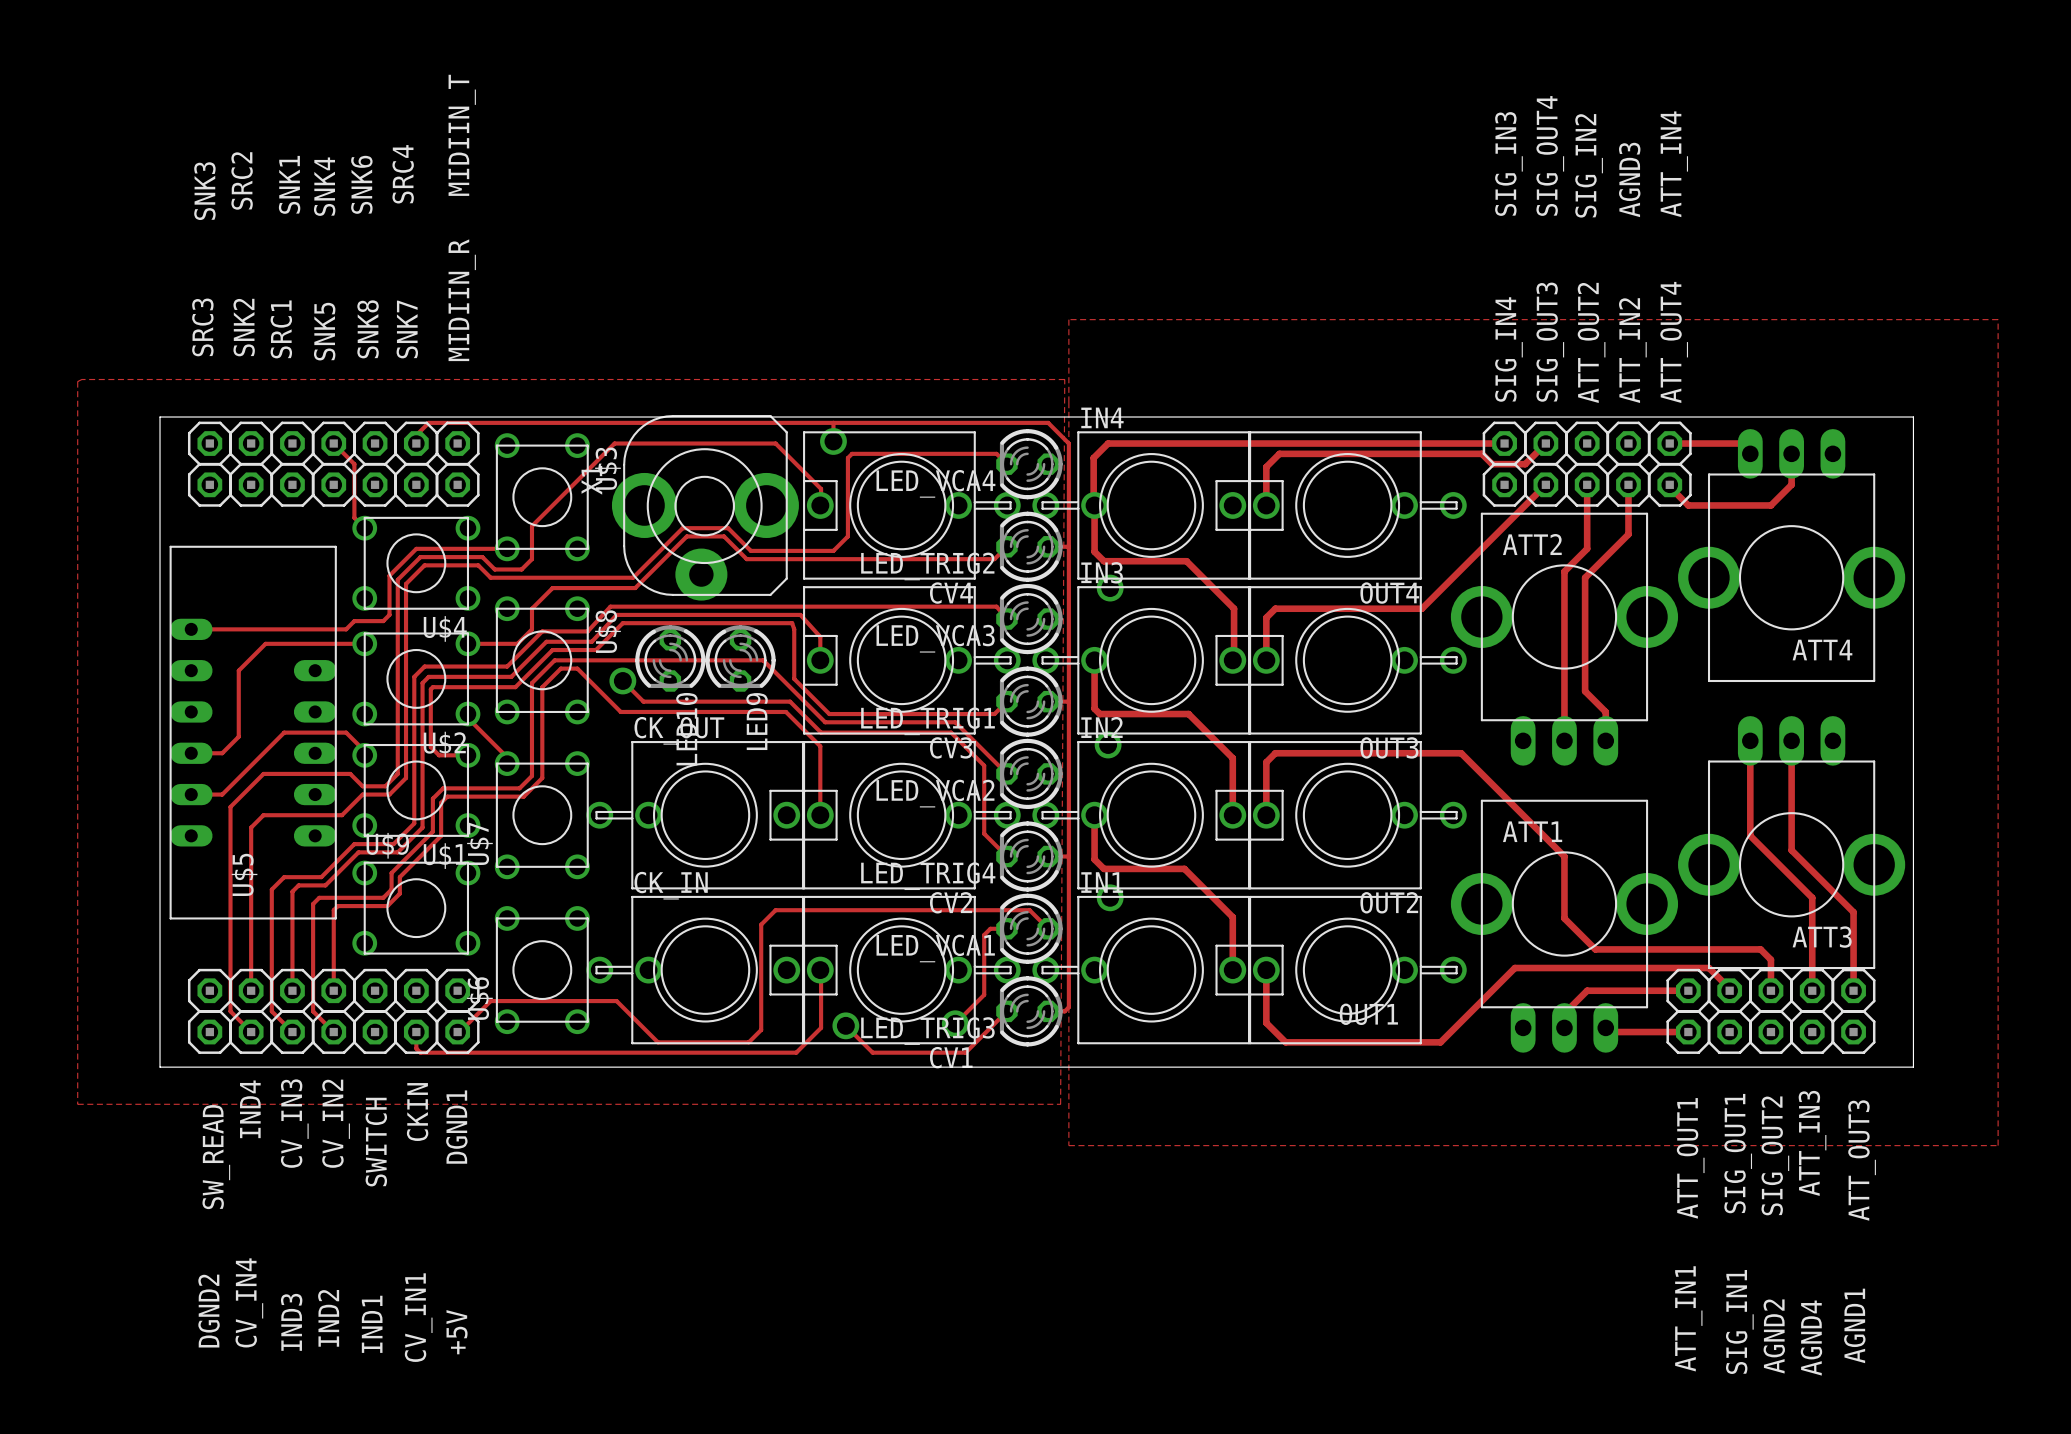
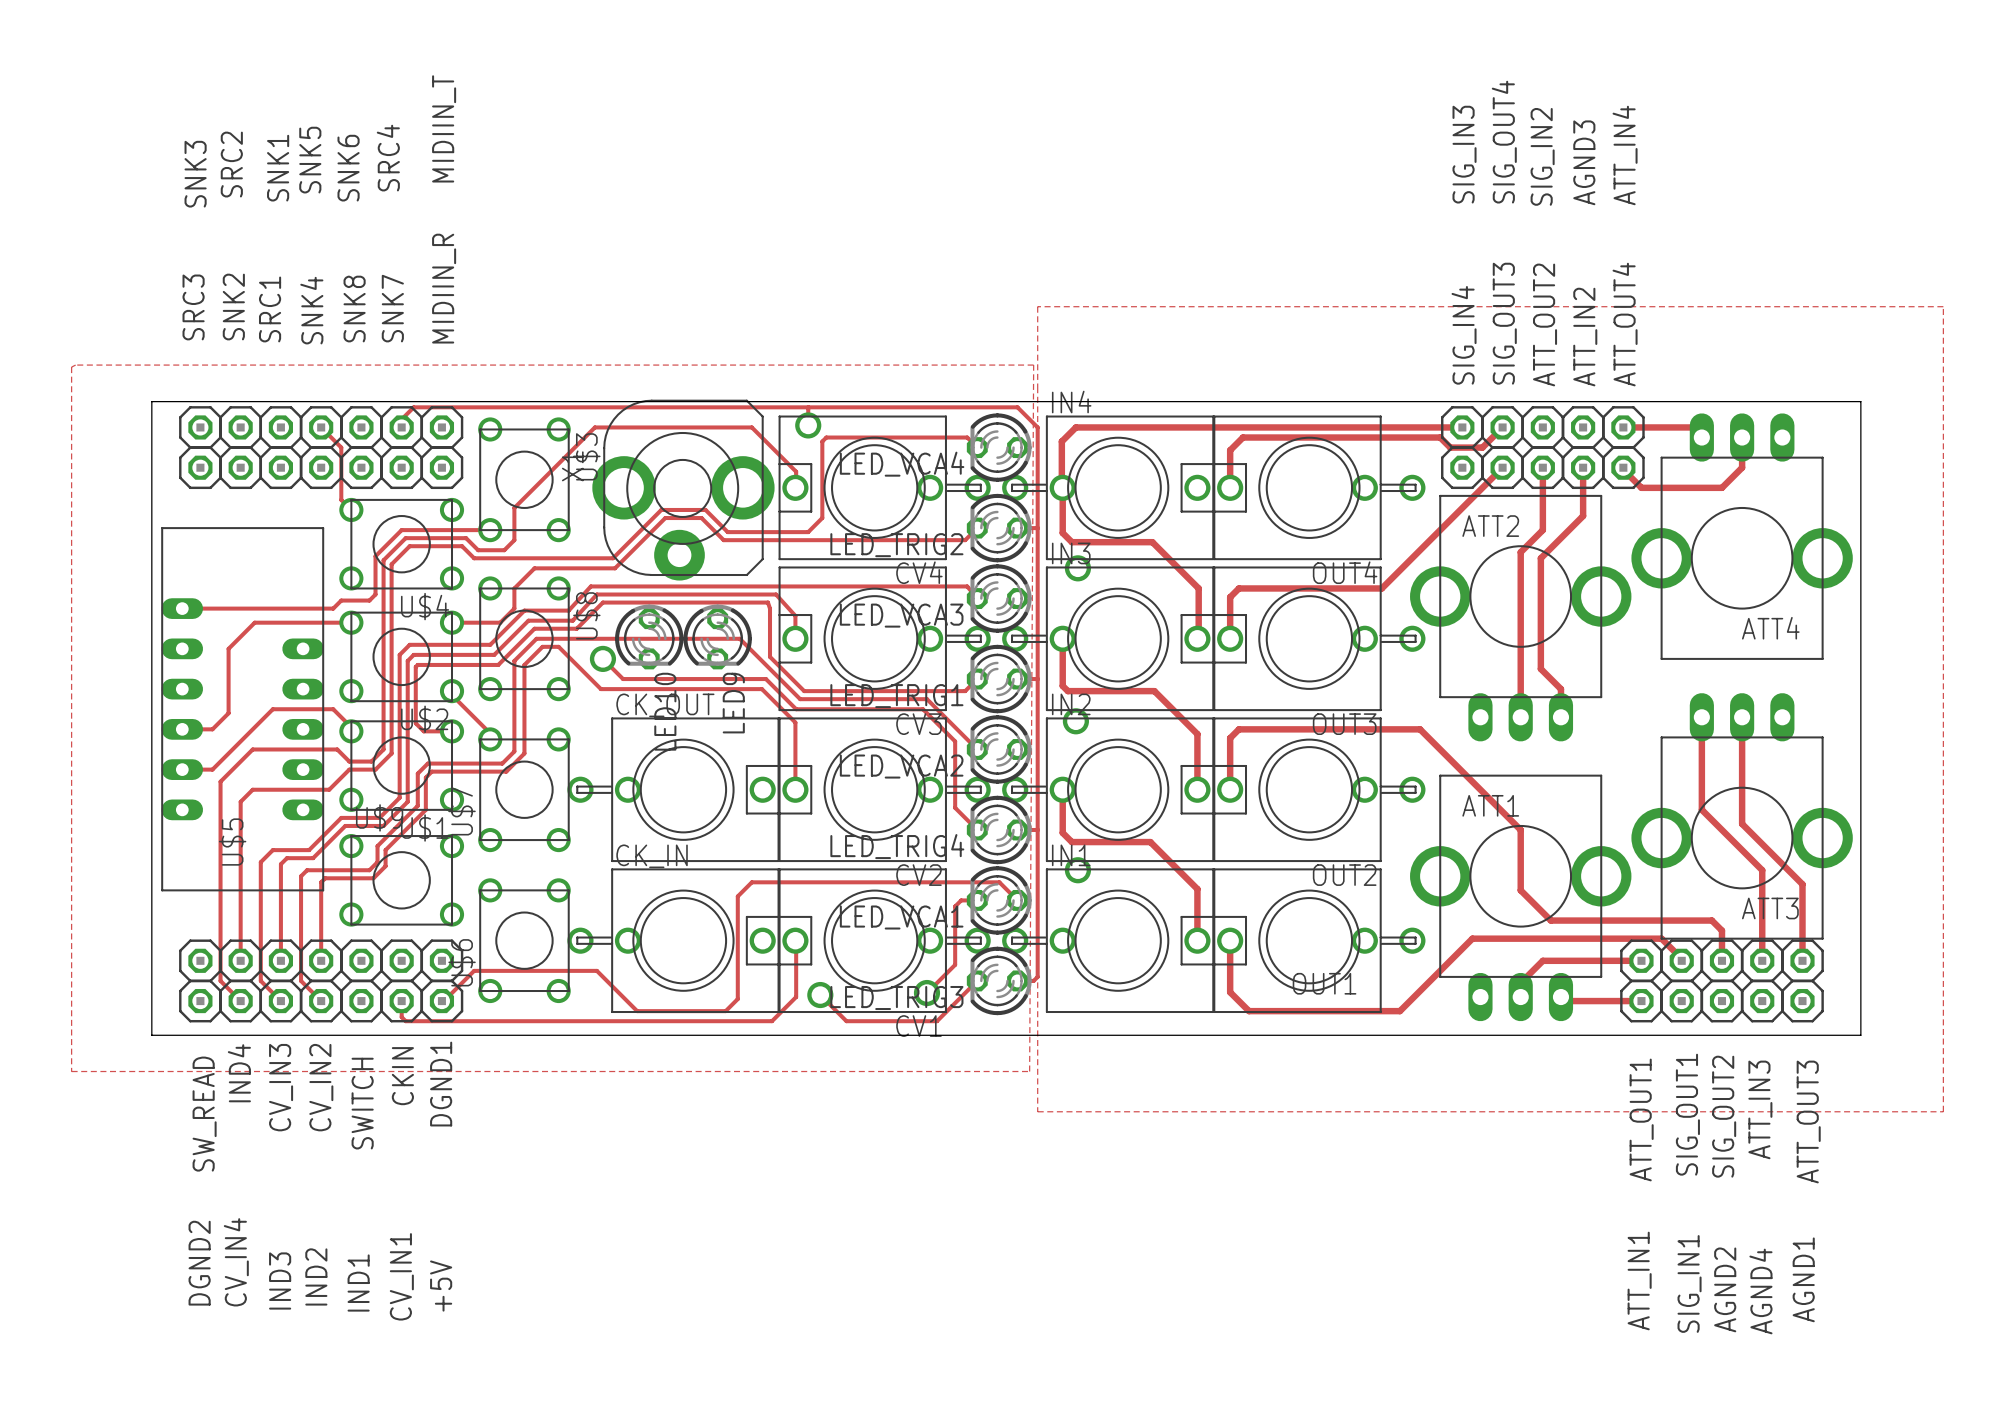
SNK4 name position: SNK4 (324, 186) -> SNK4 (311, 310)
SNK5 name position: SNK5 (324, 331) -> SNK5 (310, 160)

